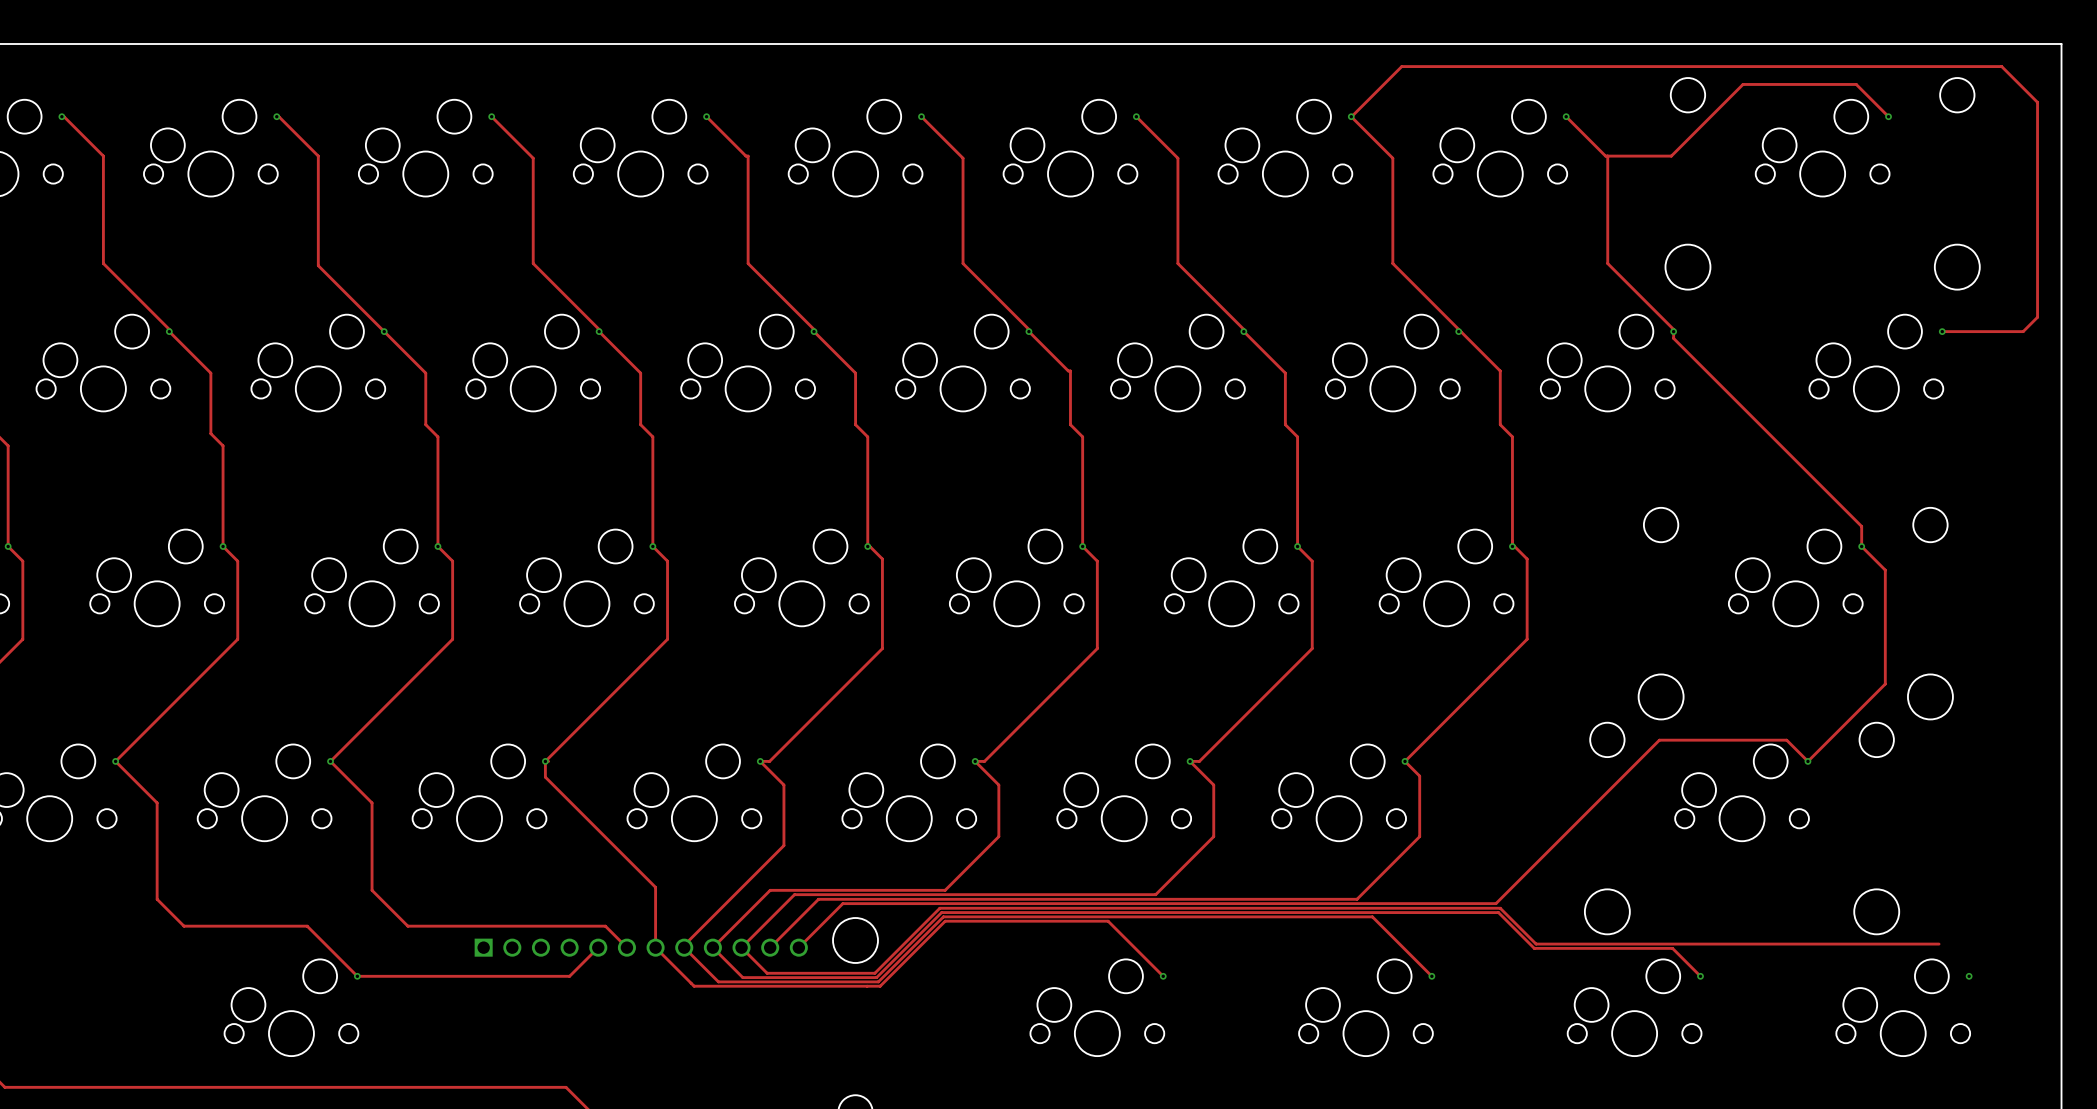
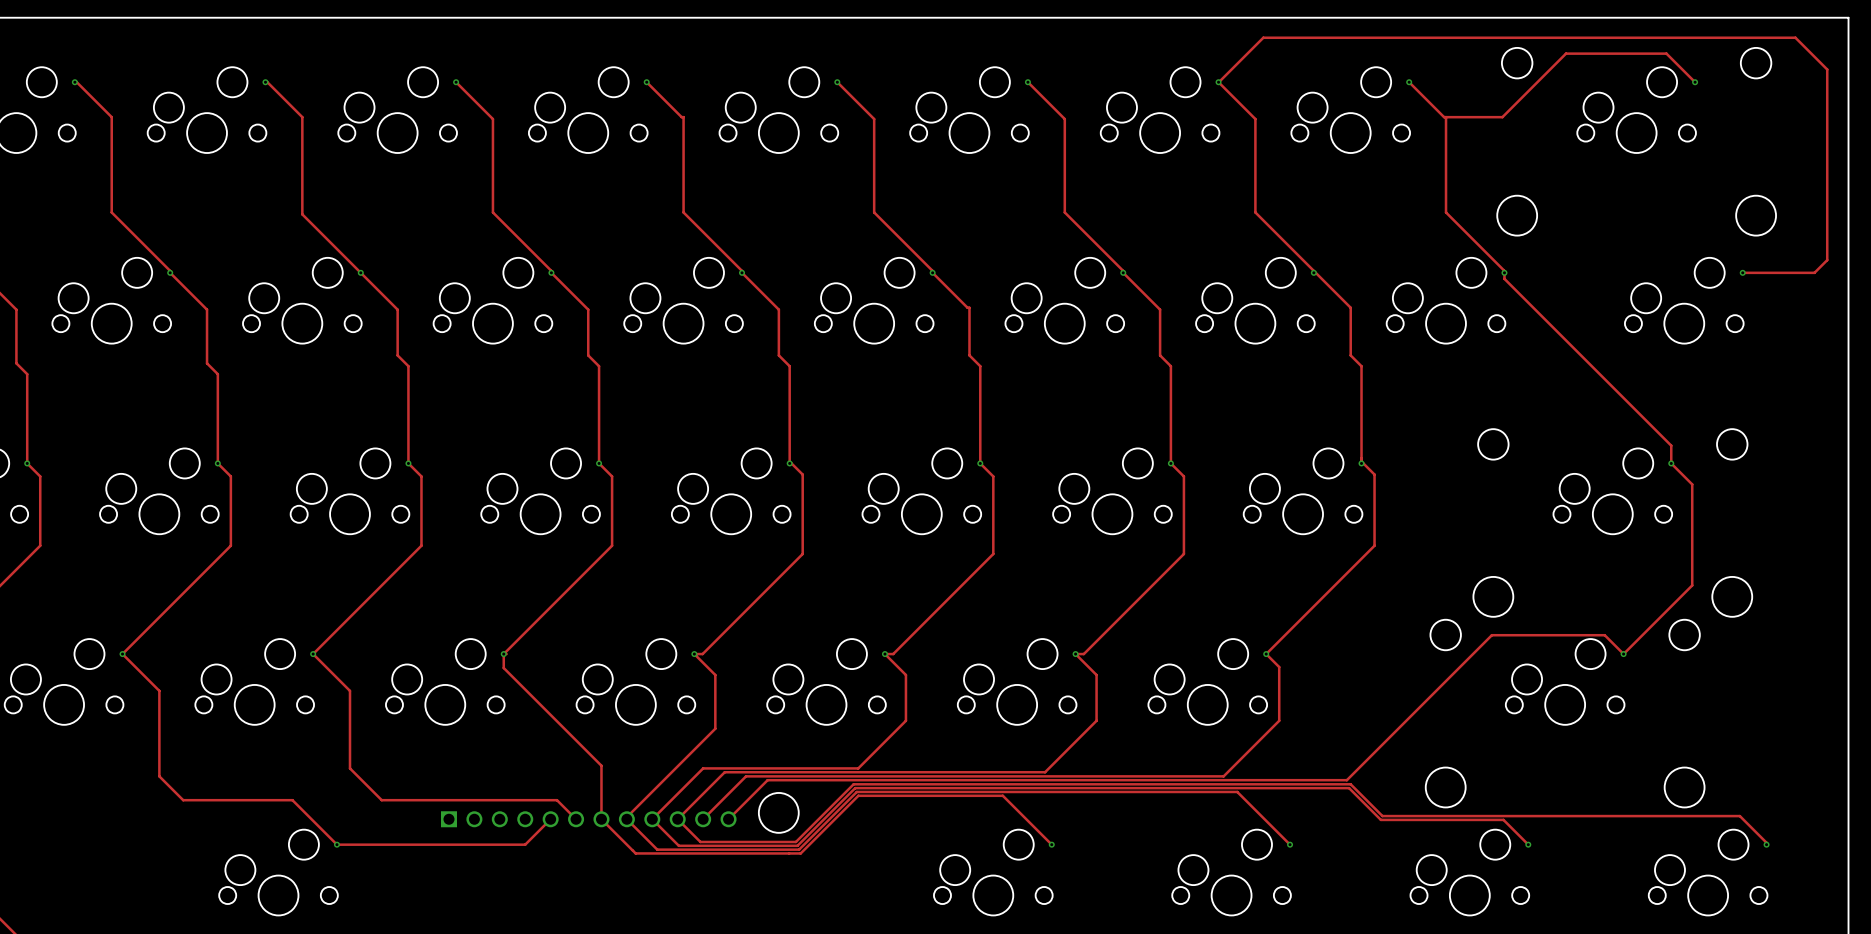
track: none -> (1739, 816) (1766, 844)

